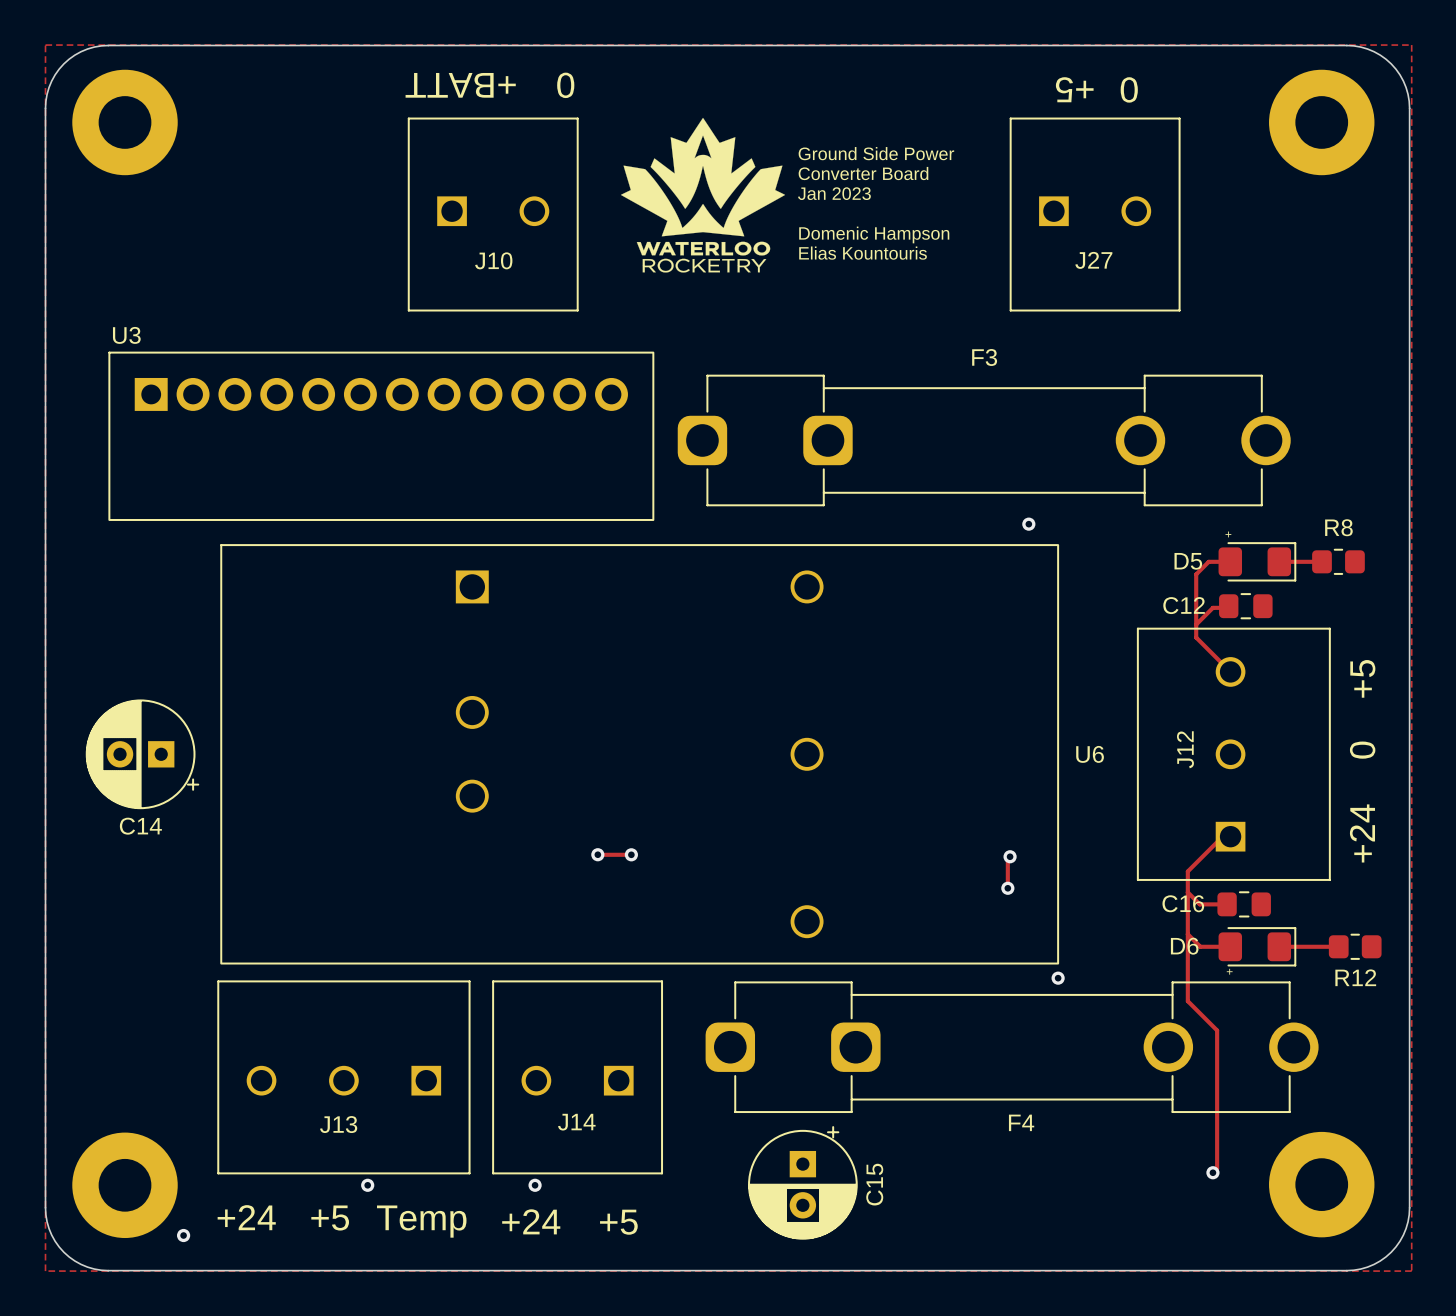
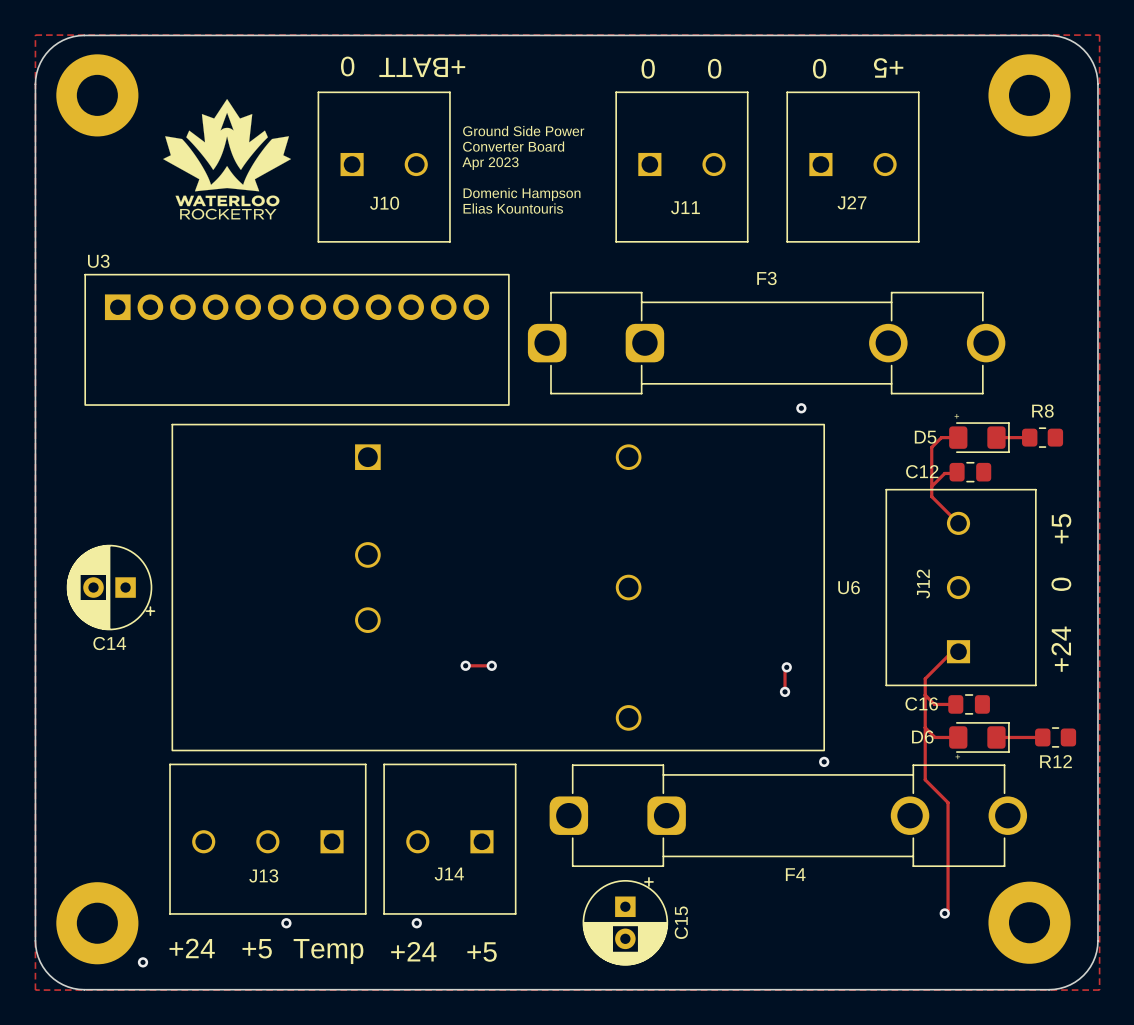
text position: +BATT (460, 85) -> +BATT (422, 67)
text position: 0 (565, 85) -> 0 (347, 66)
text: none -> 0 (648, 68)
text: none -> 0 (714, 68)
text position: +5 (1074, 89) -> +5 (888, 67)
text position: 0 (1129, 89) -> 0 (819, 68)
text position: Ground Side Power (876, 153) -> Ground Side Power (523, 131)
text position: Converter Board (863, 173) -> Converter Board (513, 146)
text: Jan 2023 (834, 193) -> none
drawing position: (703, 195) -> (227, 159)
text: none -> Apr 2023 (490, 163)
J11: none -> (681, 167)
text position: Domenic Hampson (874, 234) -> Domenic Hampson (522, 194)
text position: Elias Kountouris (863, 253) -> Elias Kountouris (513, 208)

